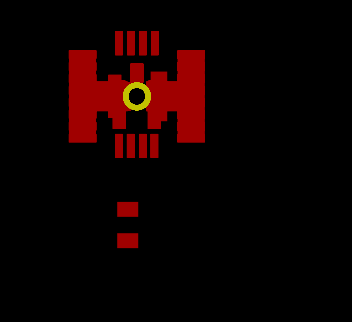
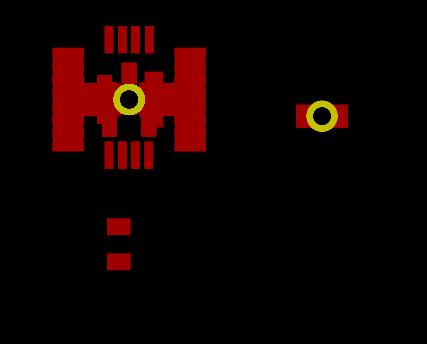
part: none -> (322, 116)
part: none -> (322, 116)

